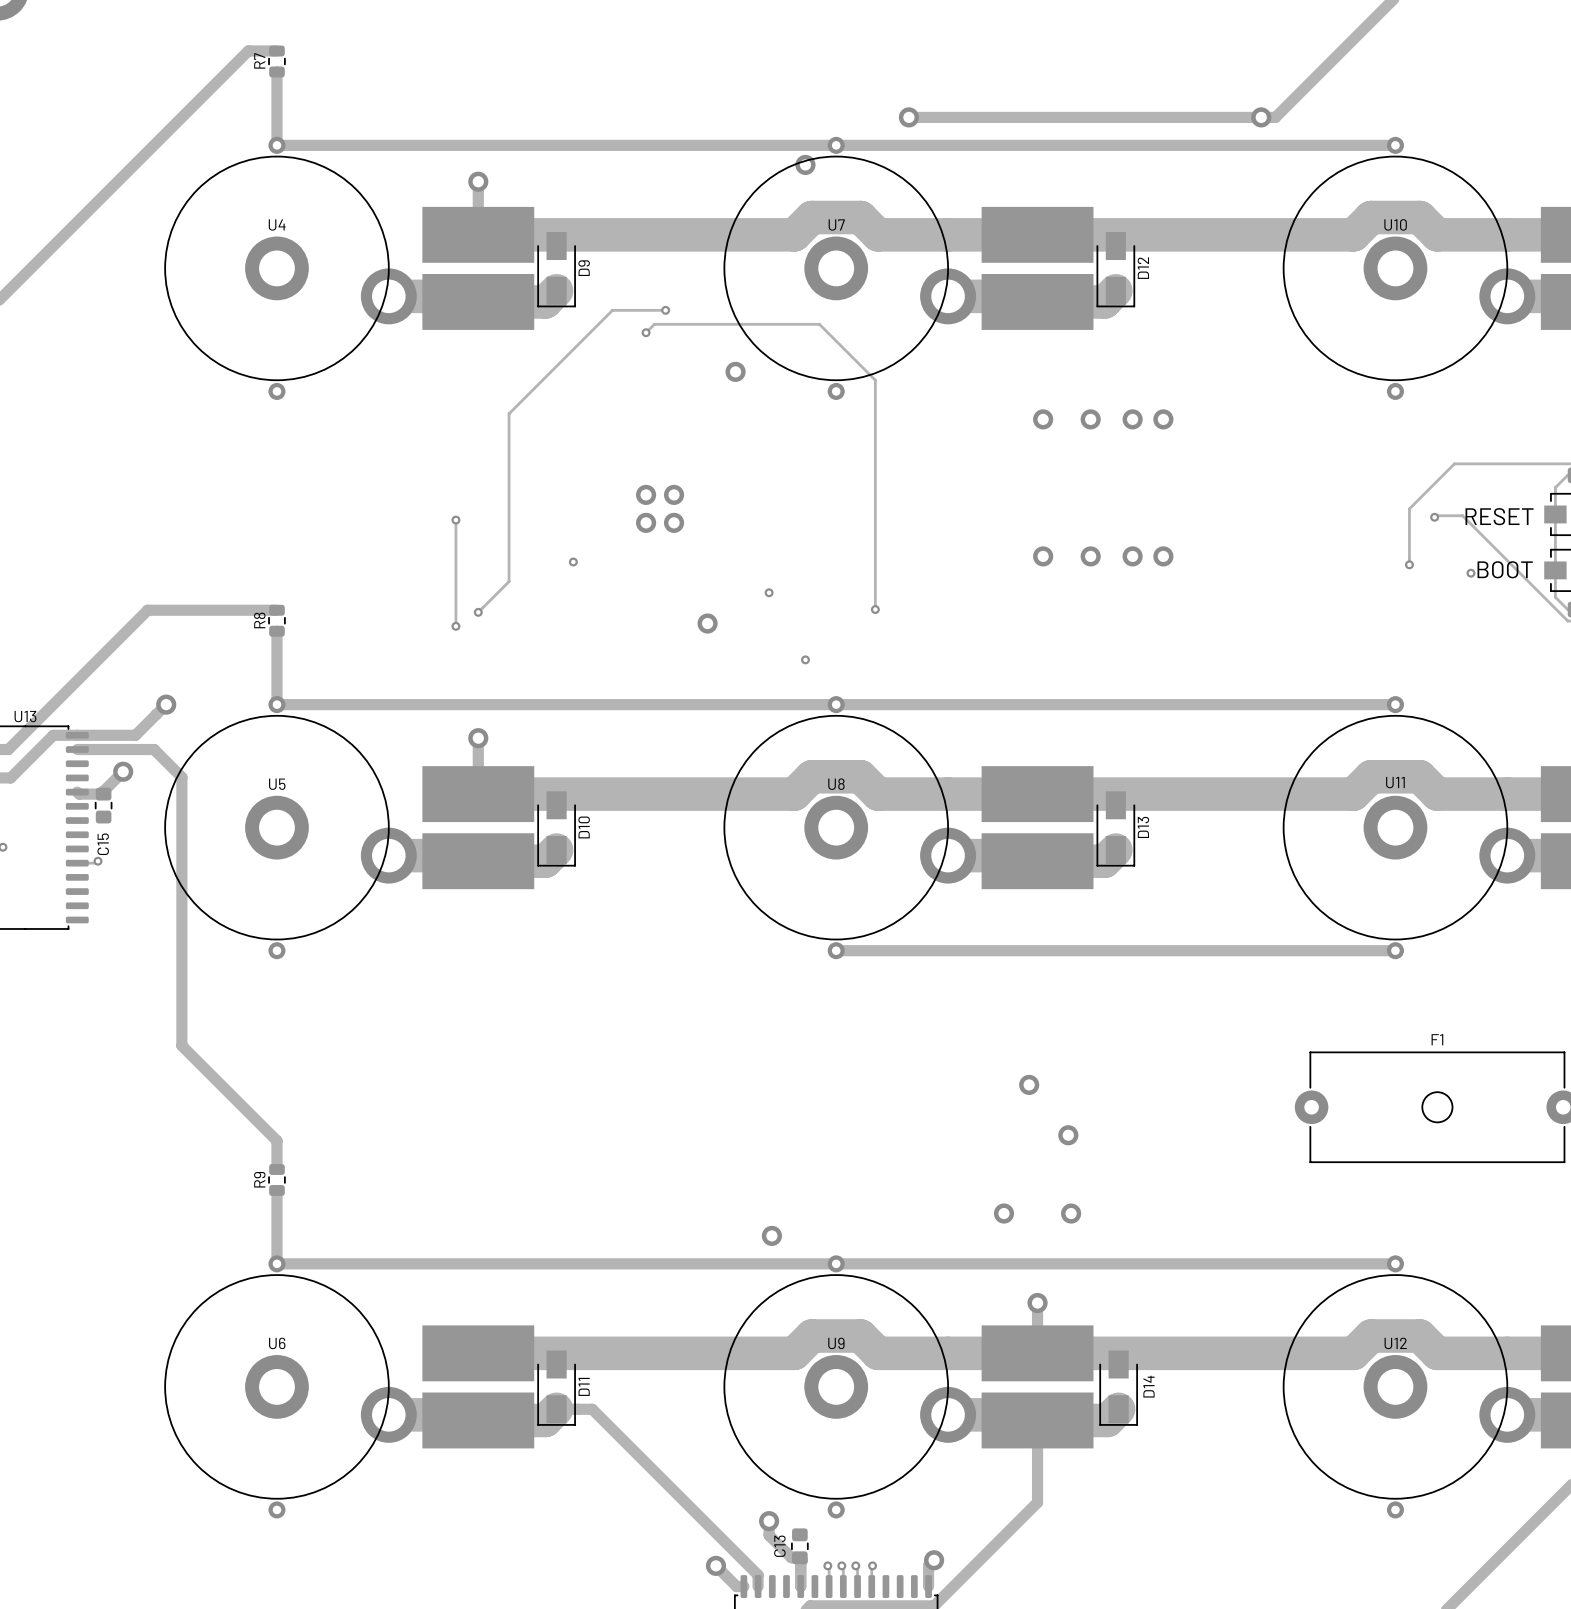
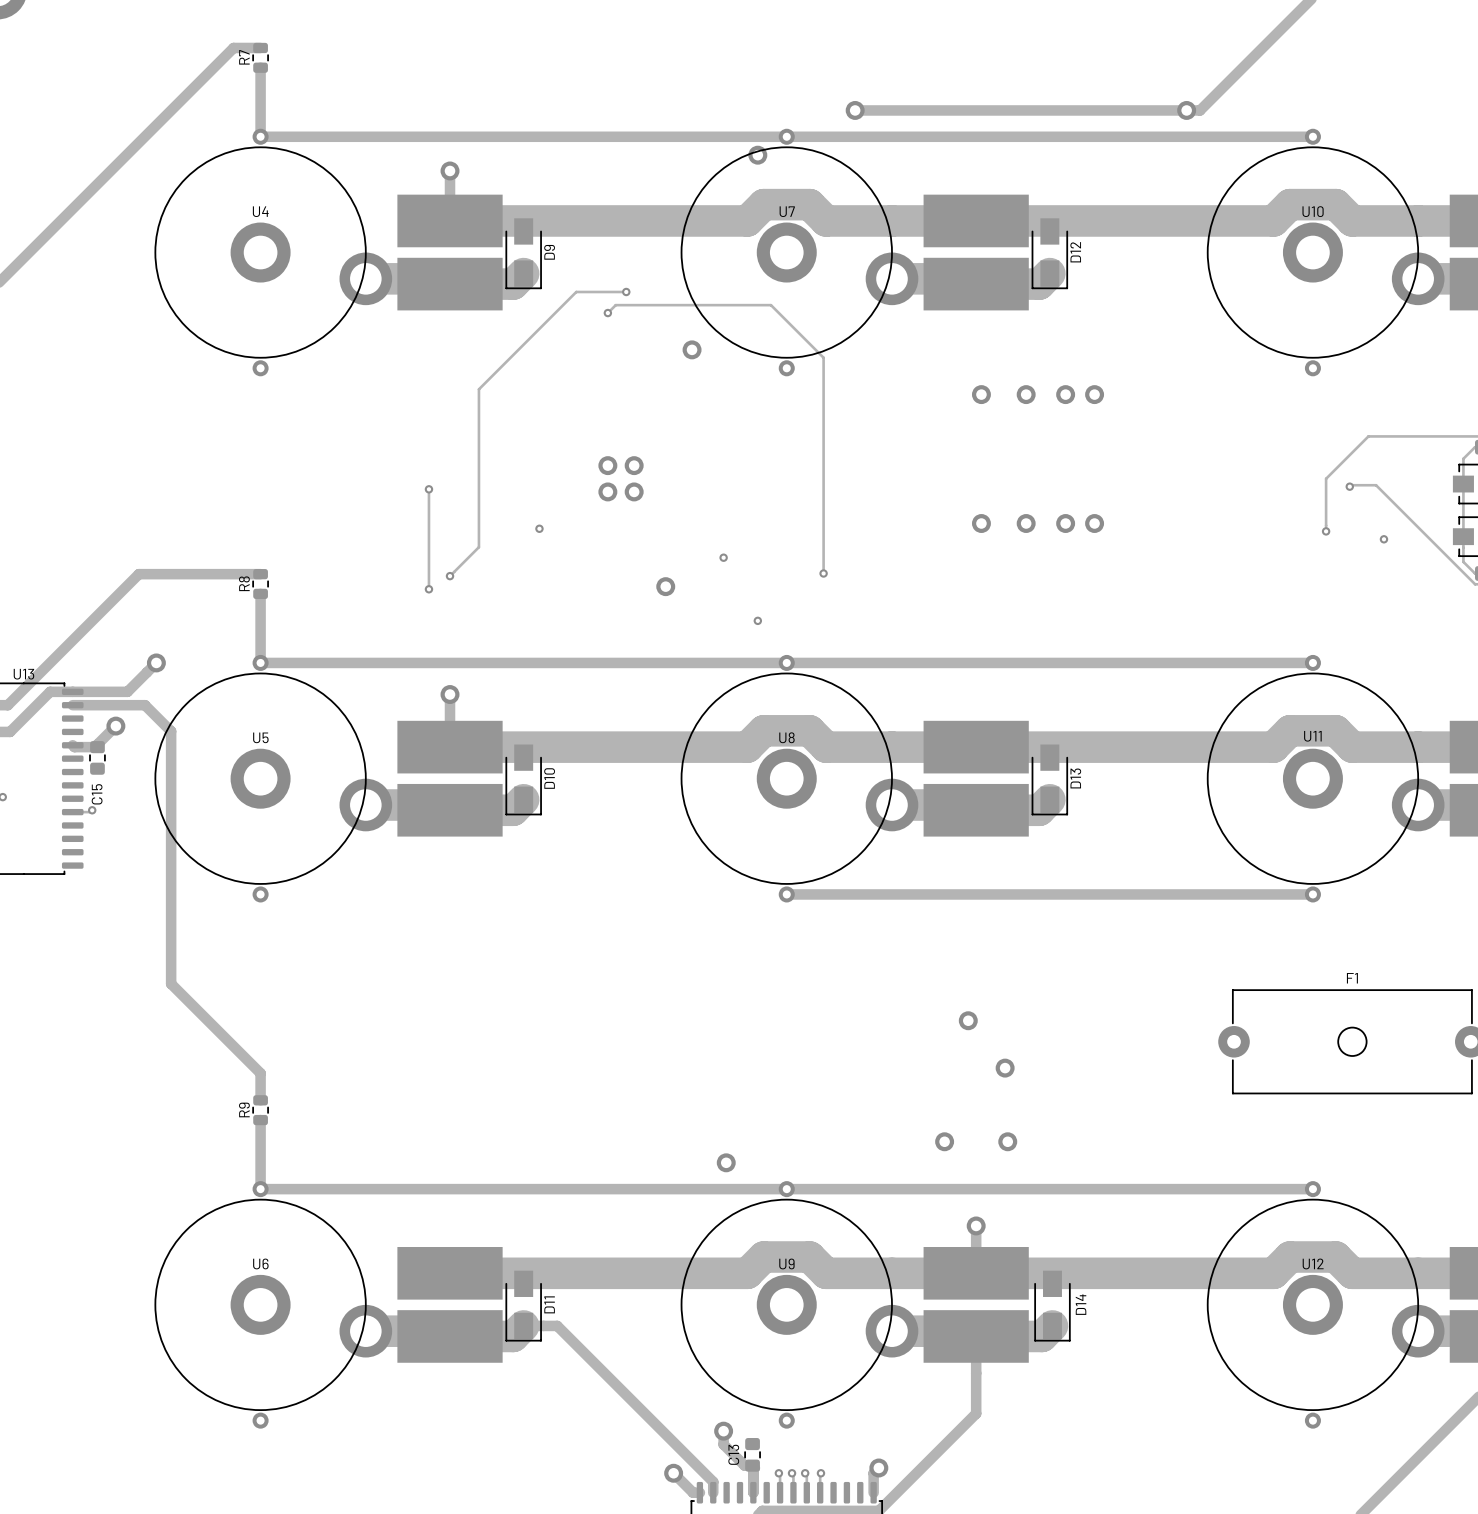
text: RESET (1499, 516) -> none
text: BOOT (1505, 569) -> none

